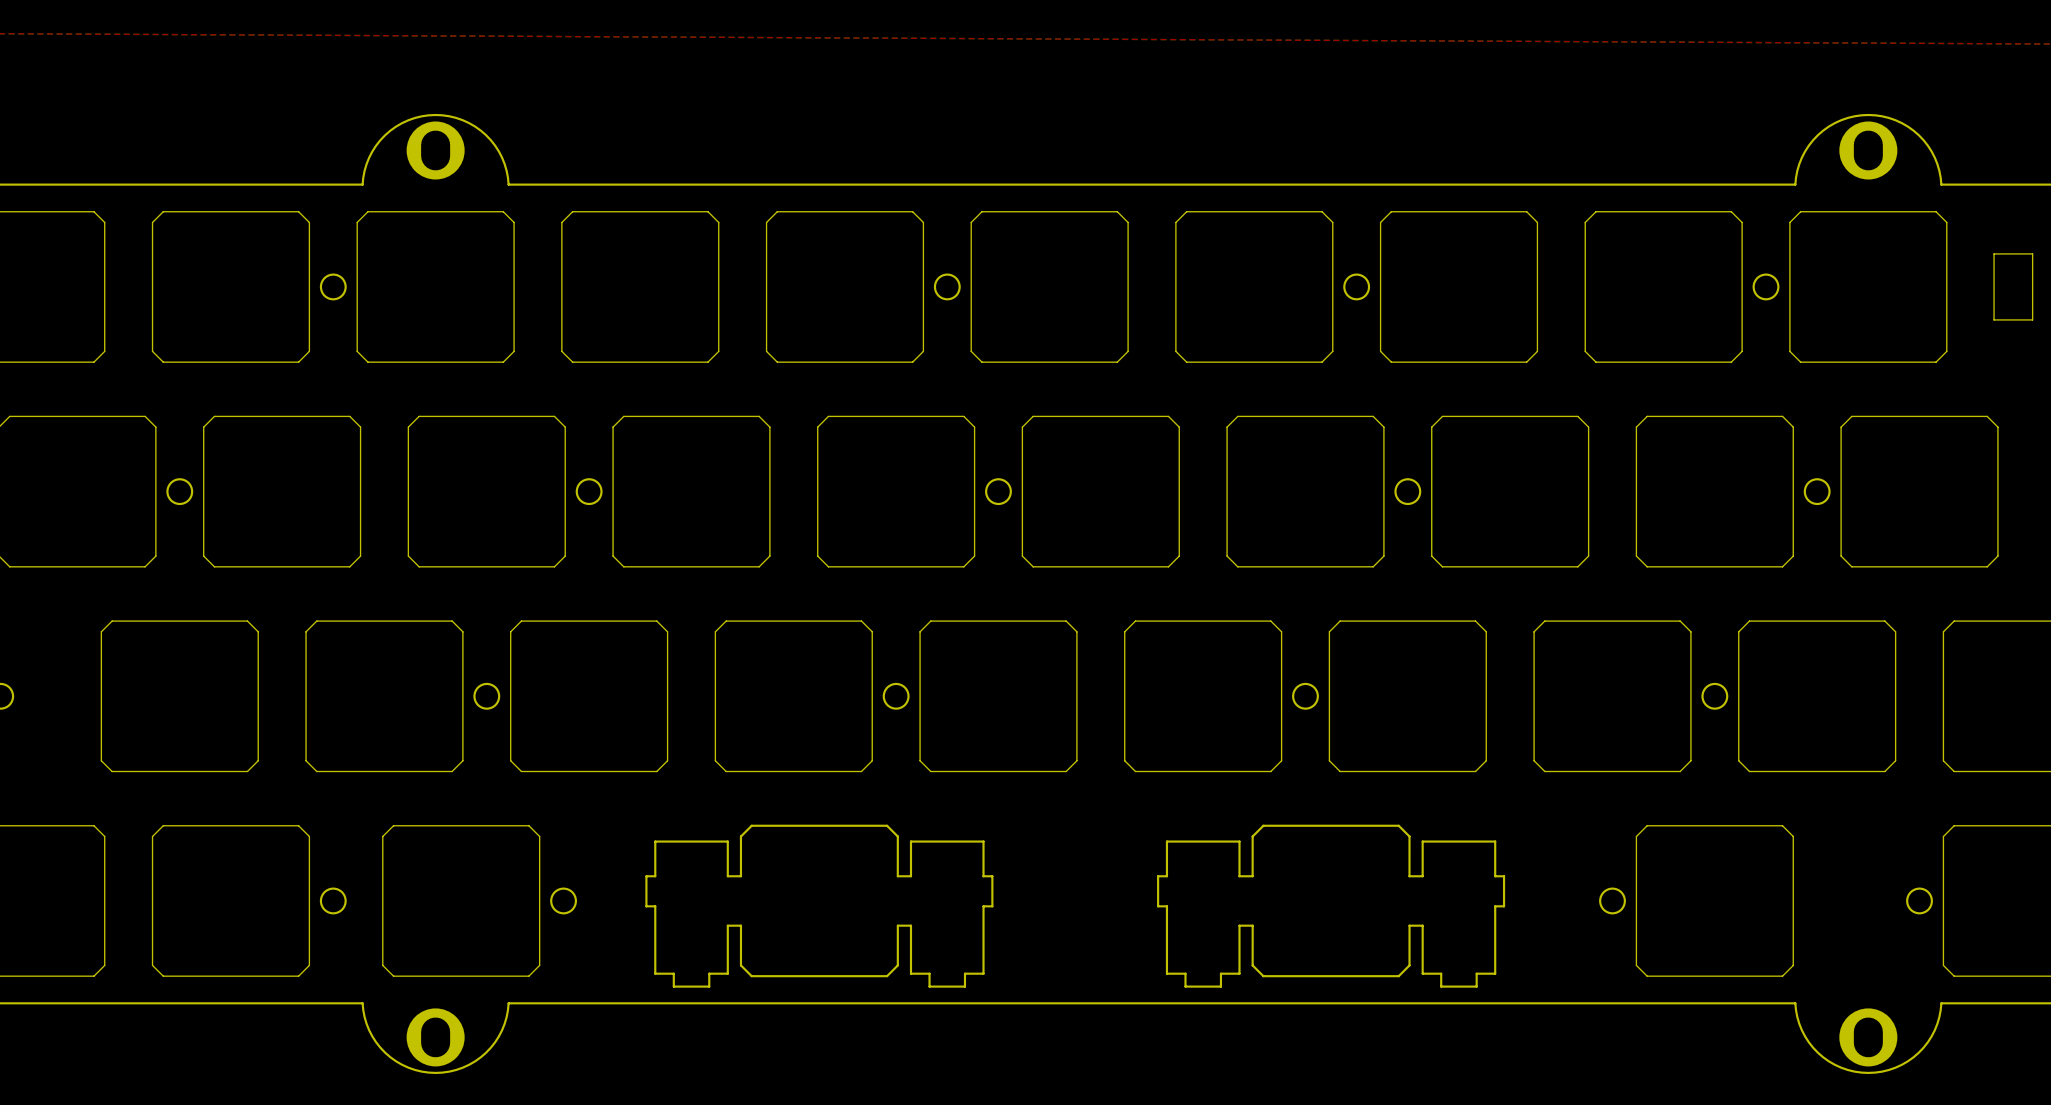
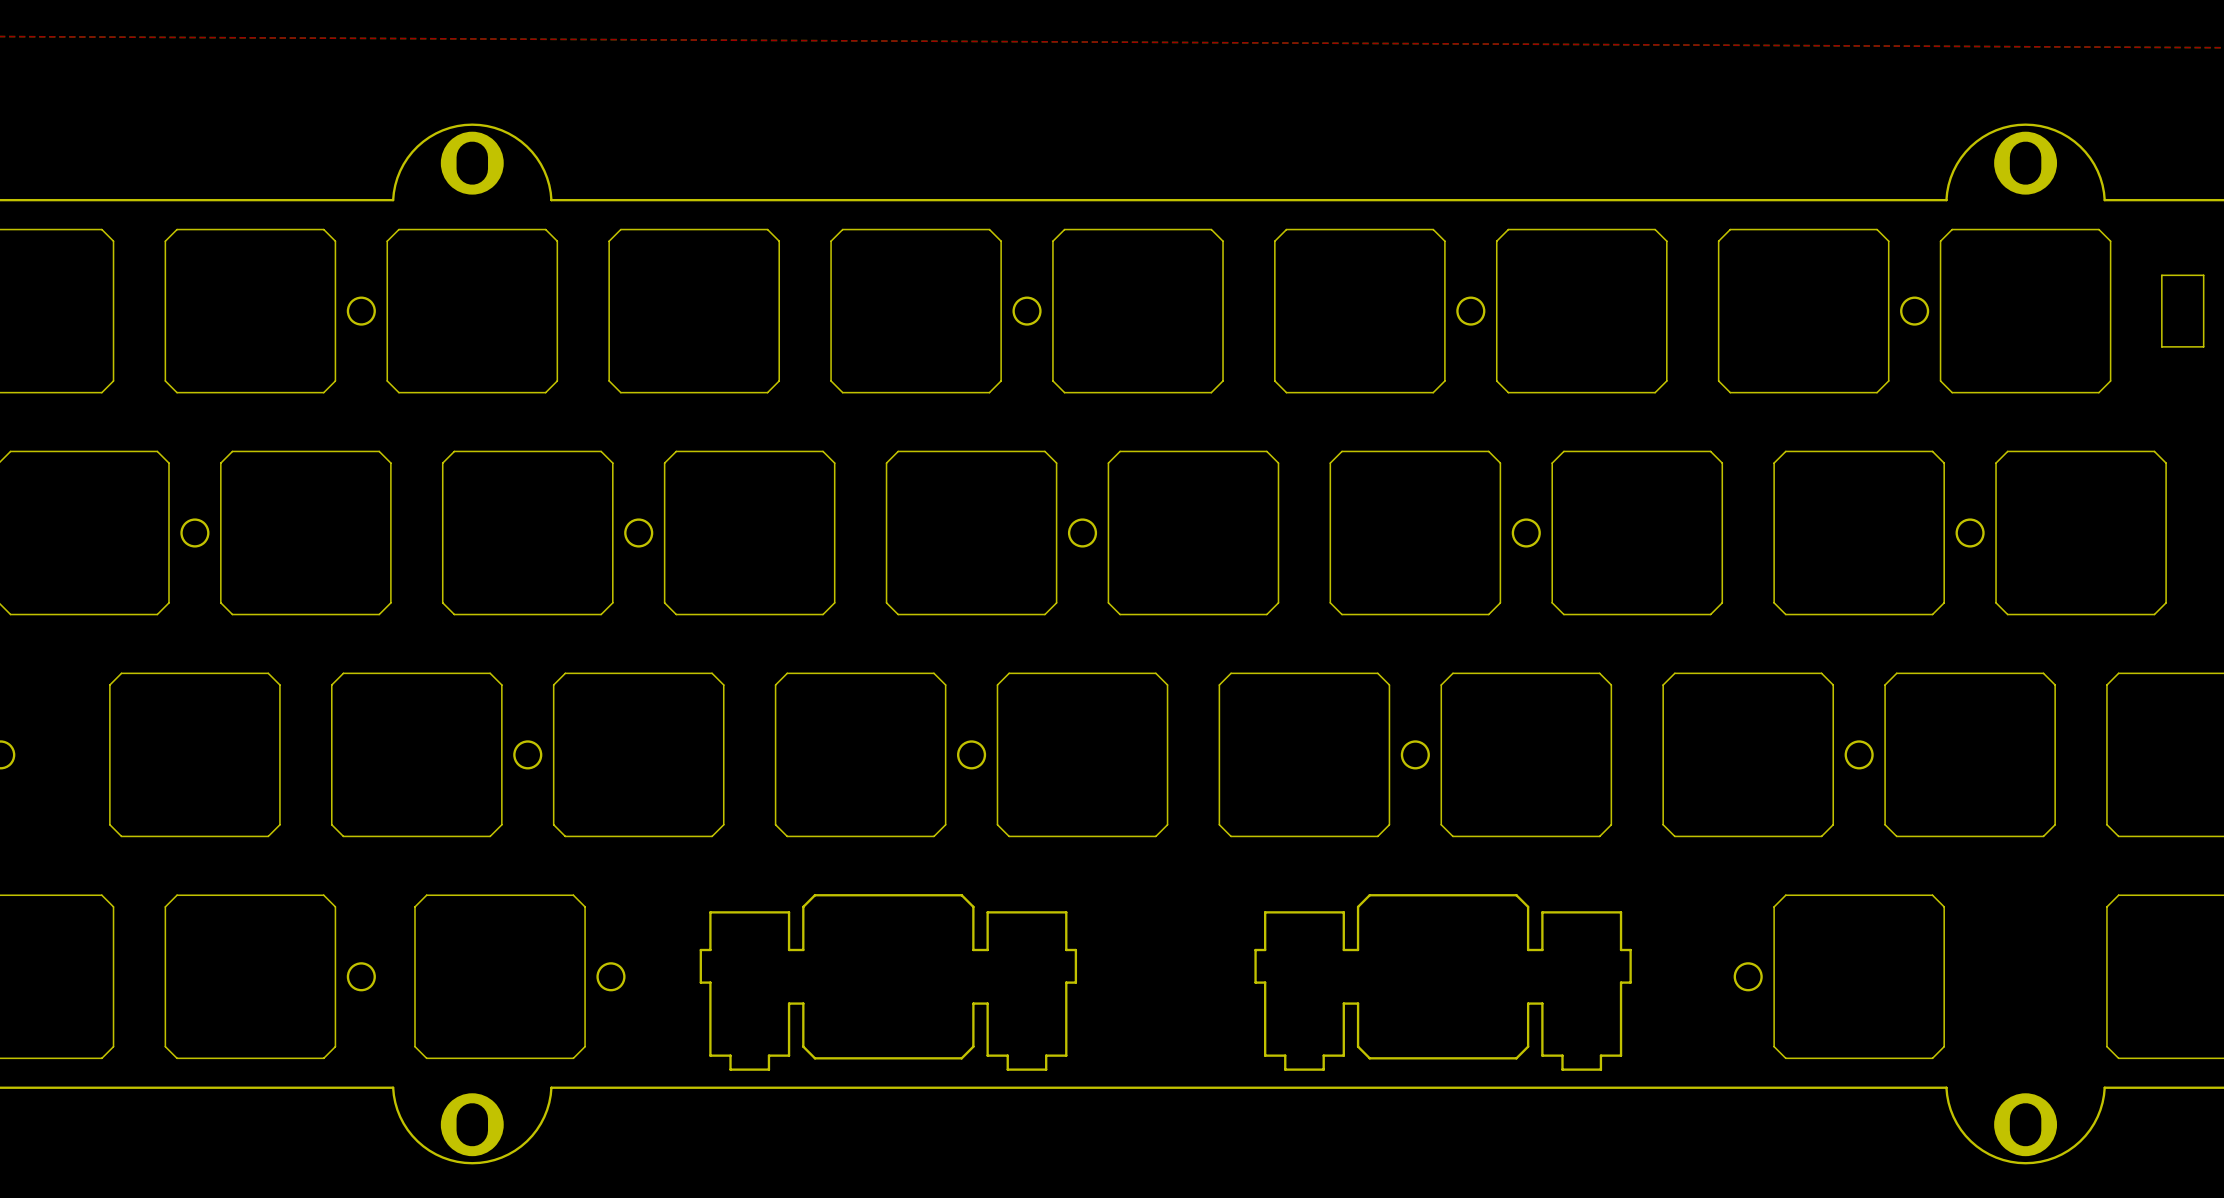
round board edge: [1906, 887, 1933, 915] -> none

